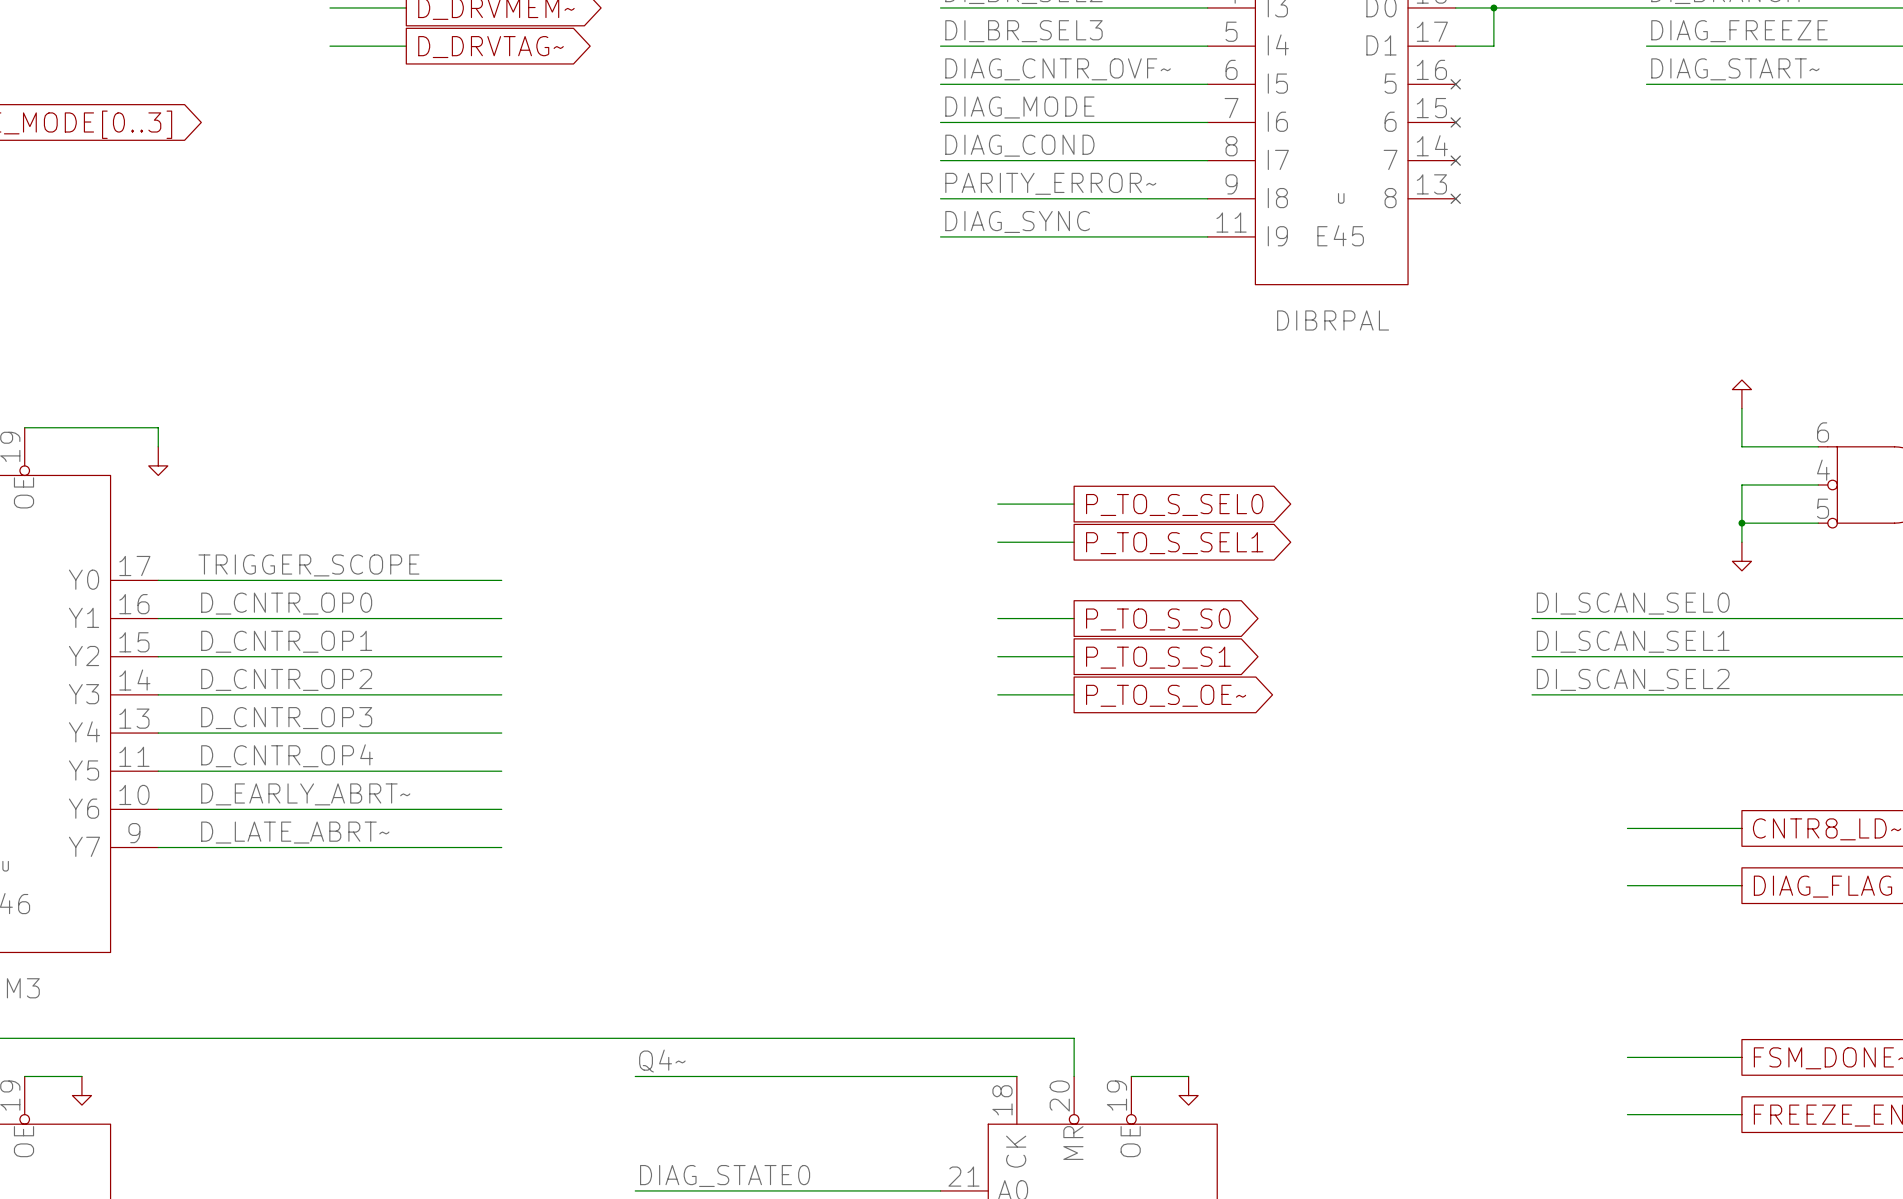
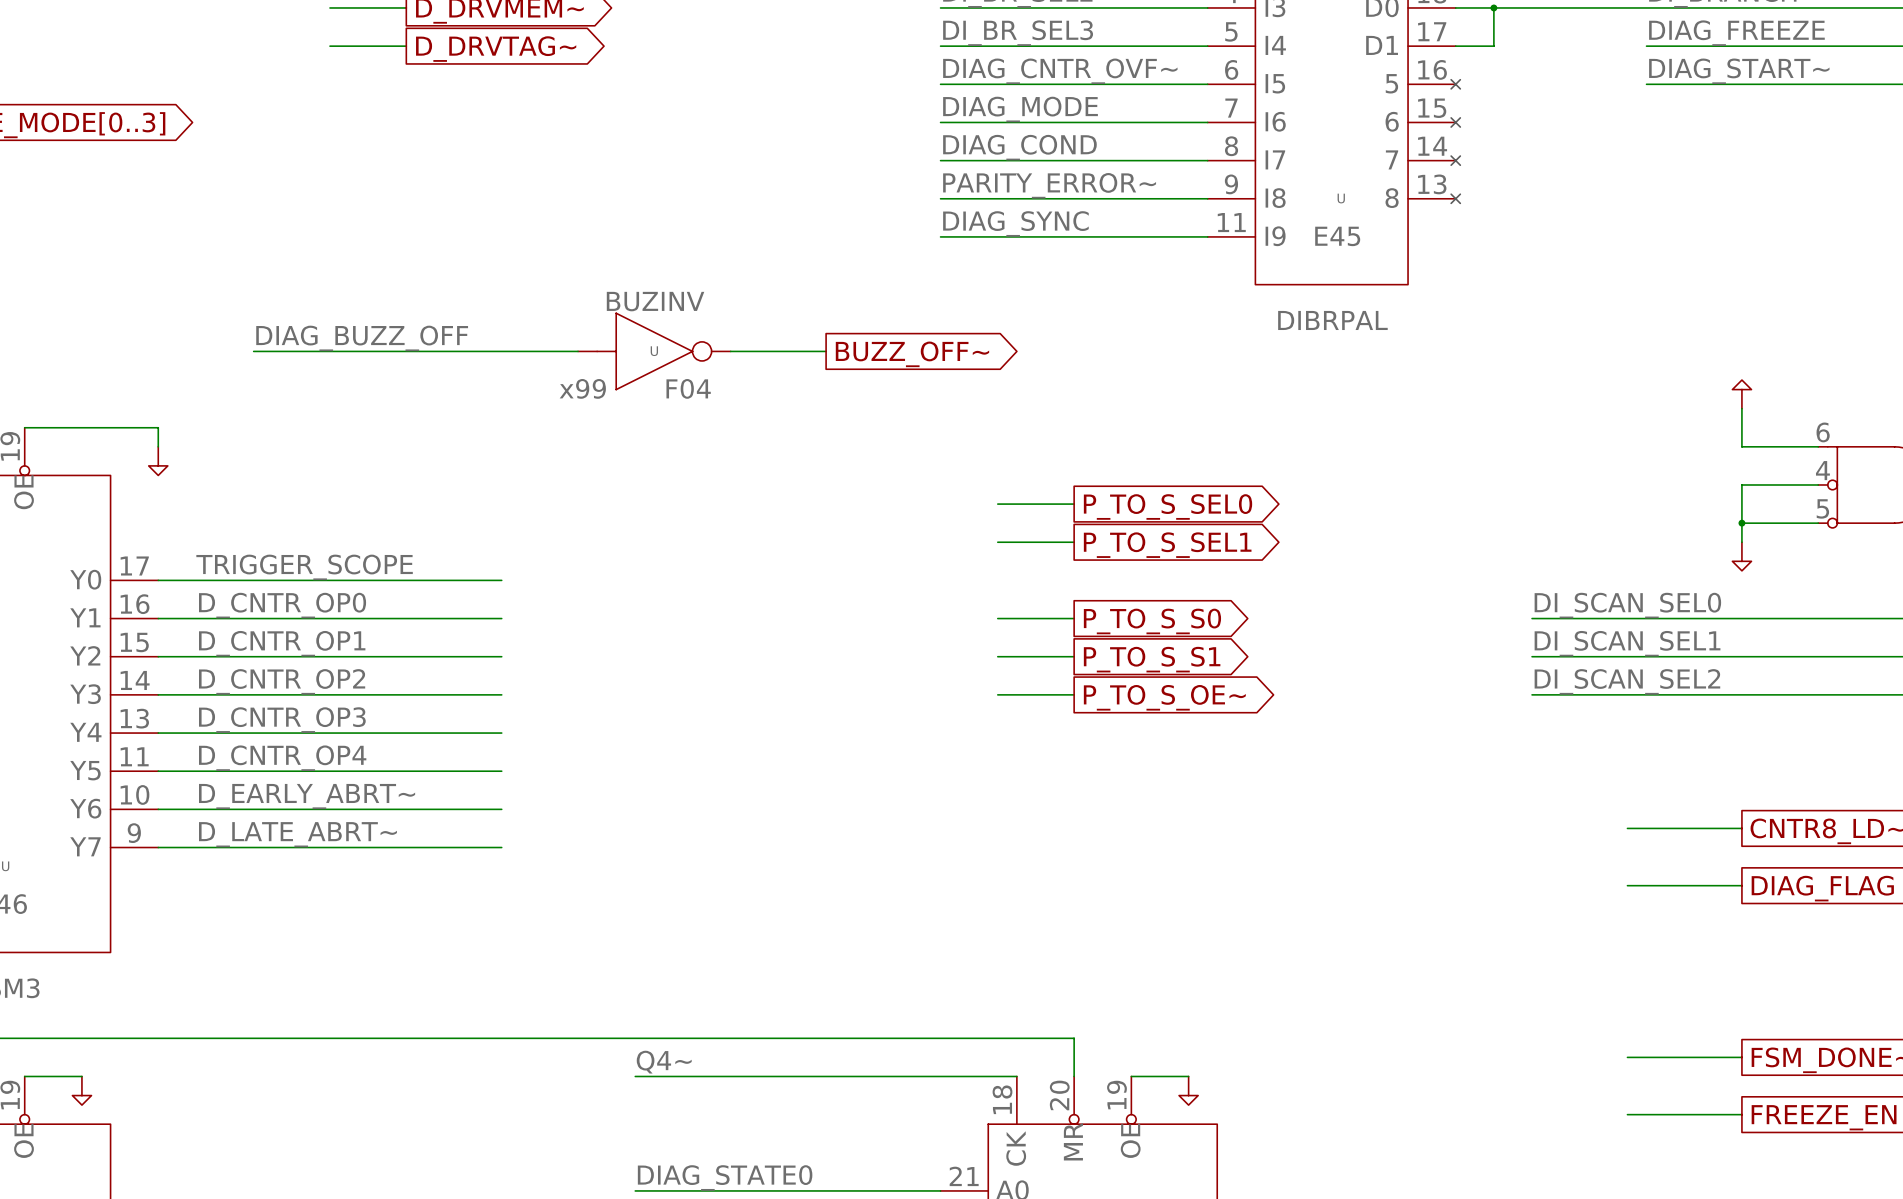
label: none -> DIAG_BUZZ_OFF (362, 338)
wire: none -> (253, 351) (578, 351)
U: none -> F04 (654, 351)
wire: none -> (730, 351) (826, 351)
global label: none -> BUZZ_OFF~ (912, 354)

